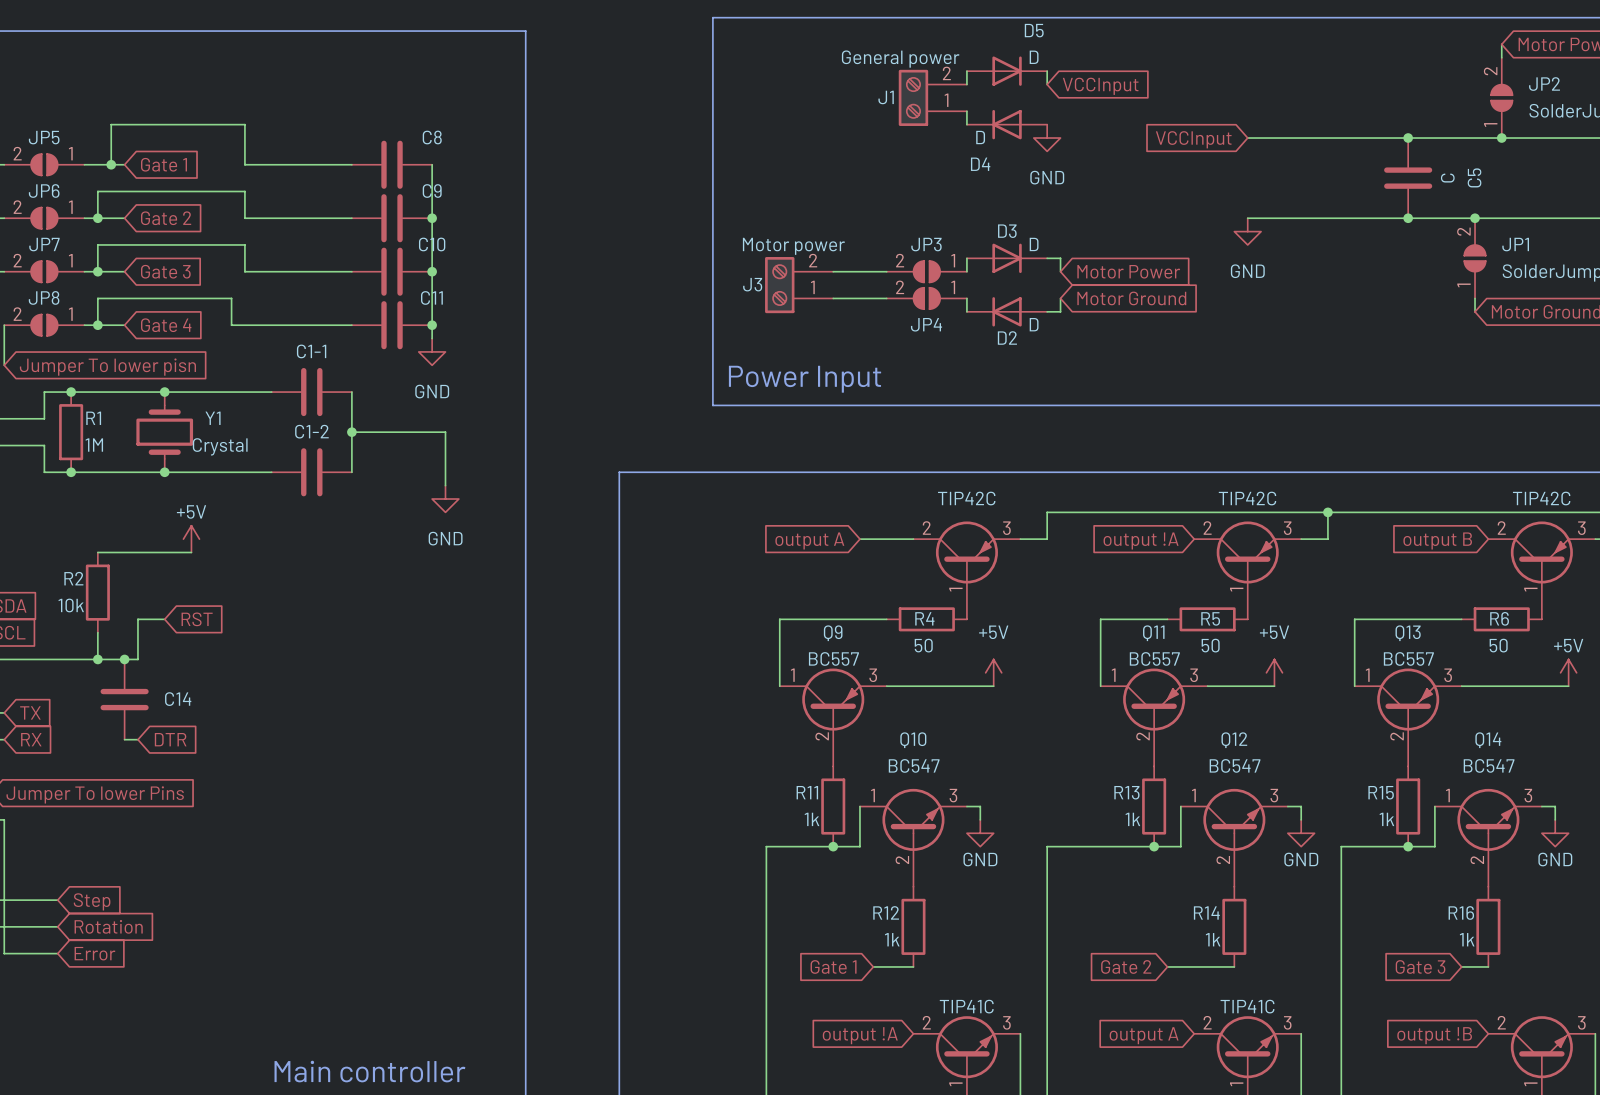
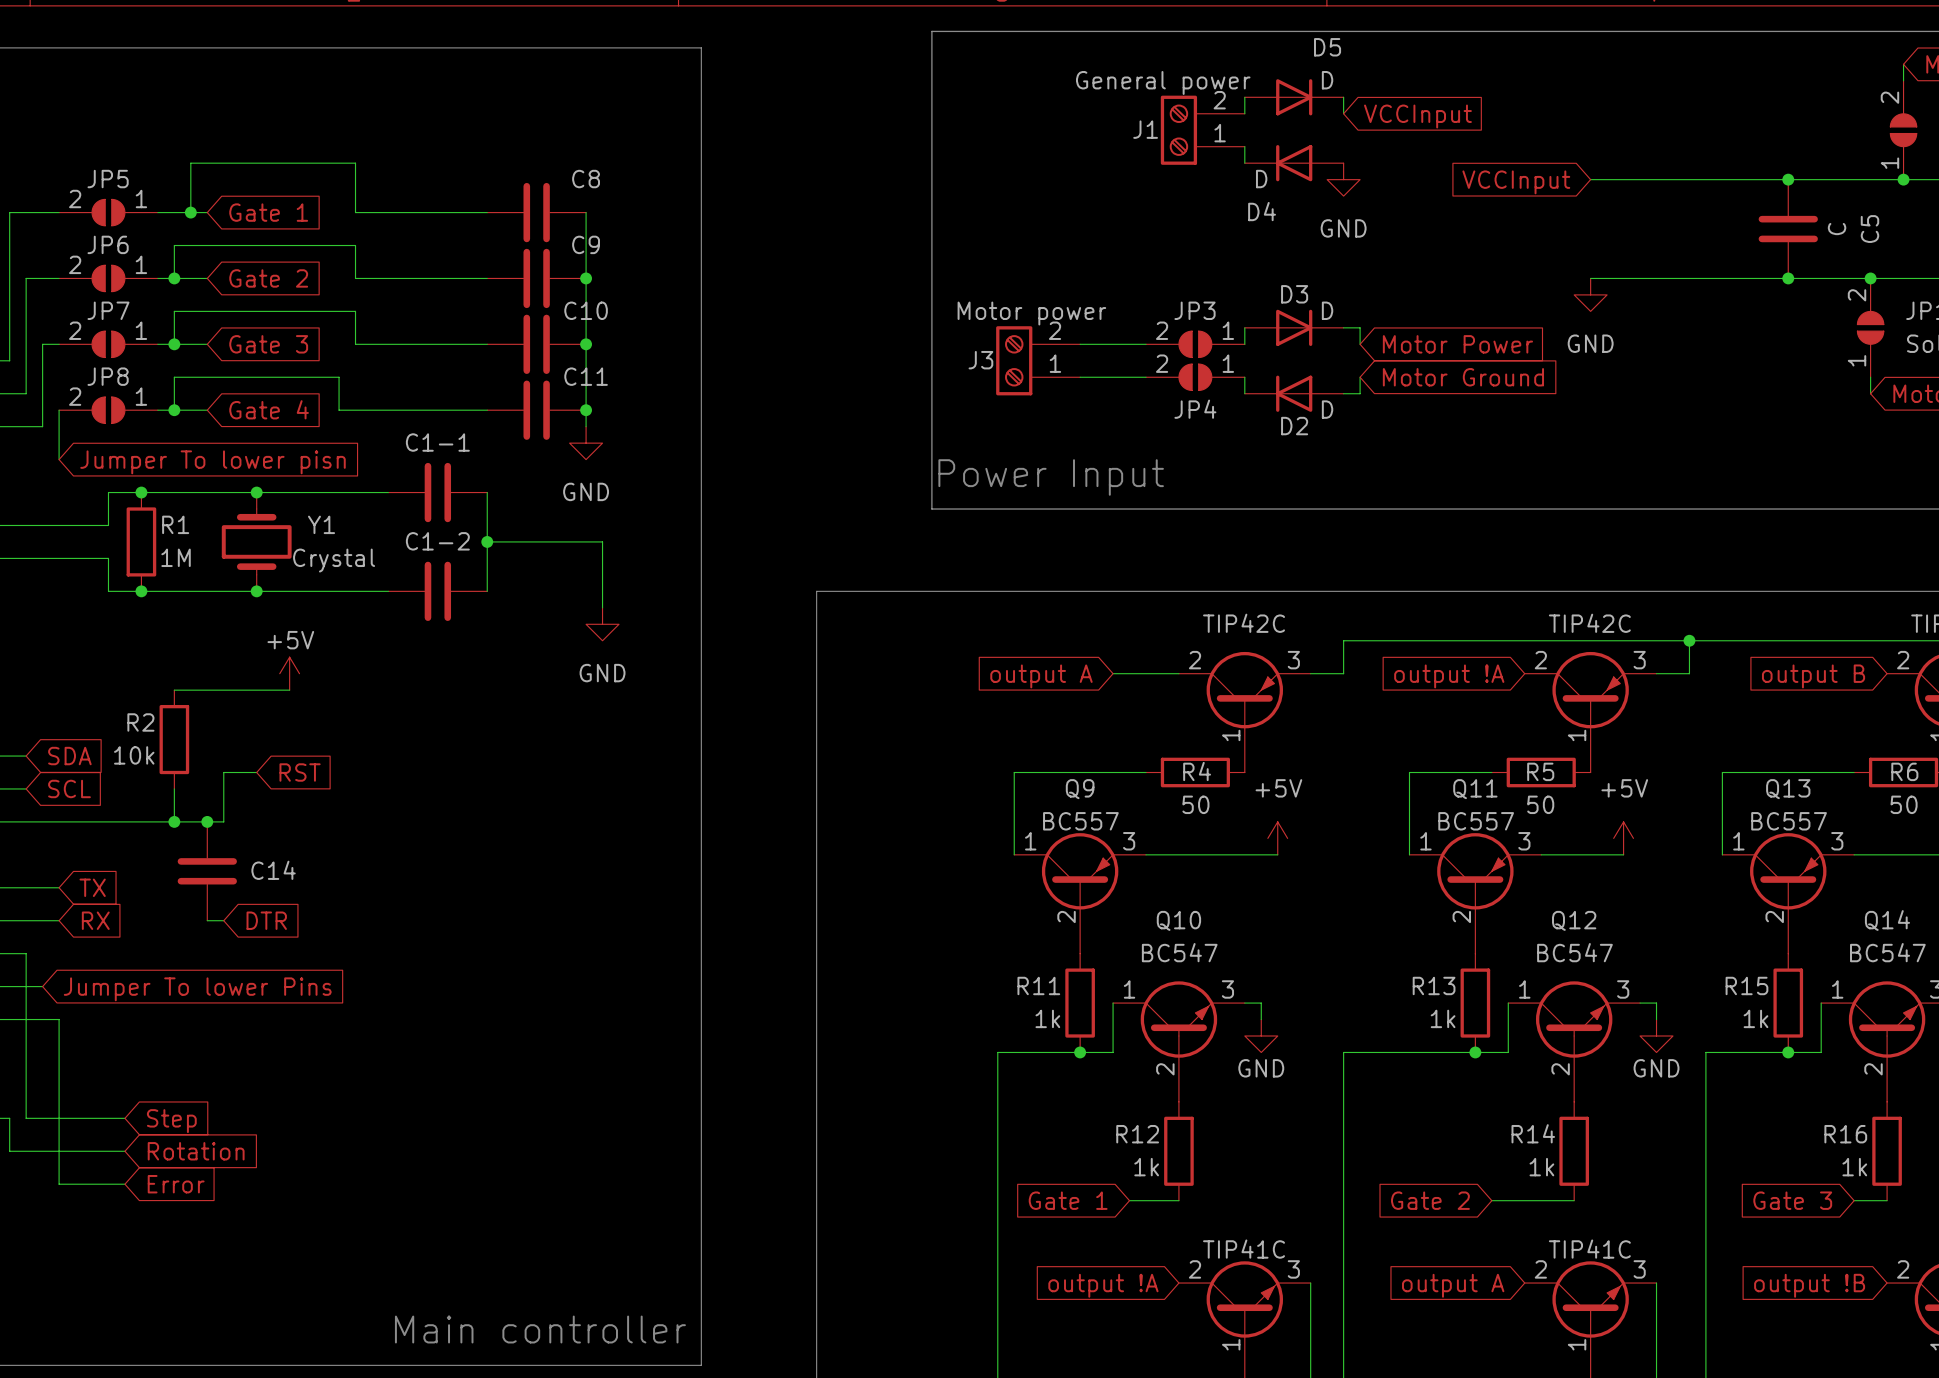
text position: Power Input (805, 379) -> Power Input (1051, 477)

